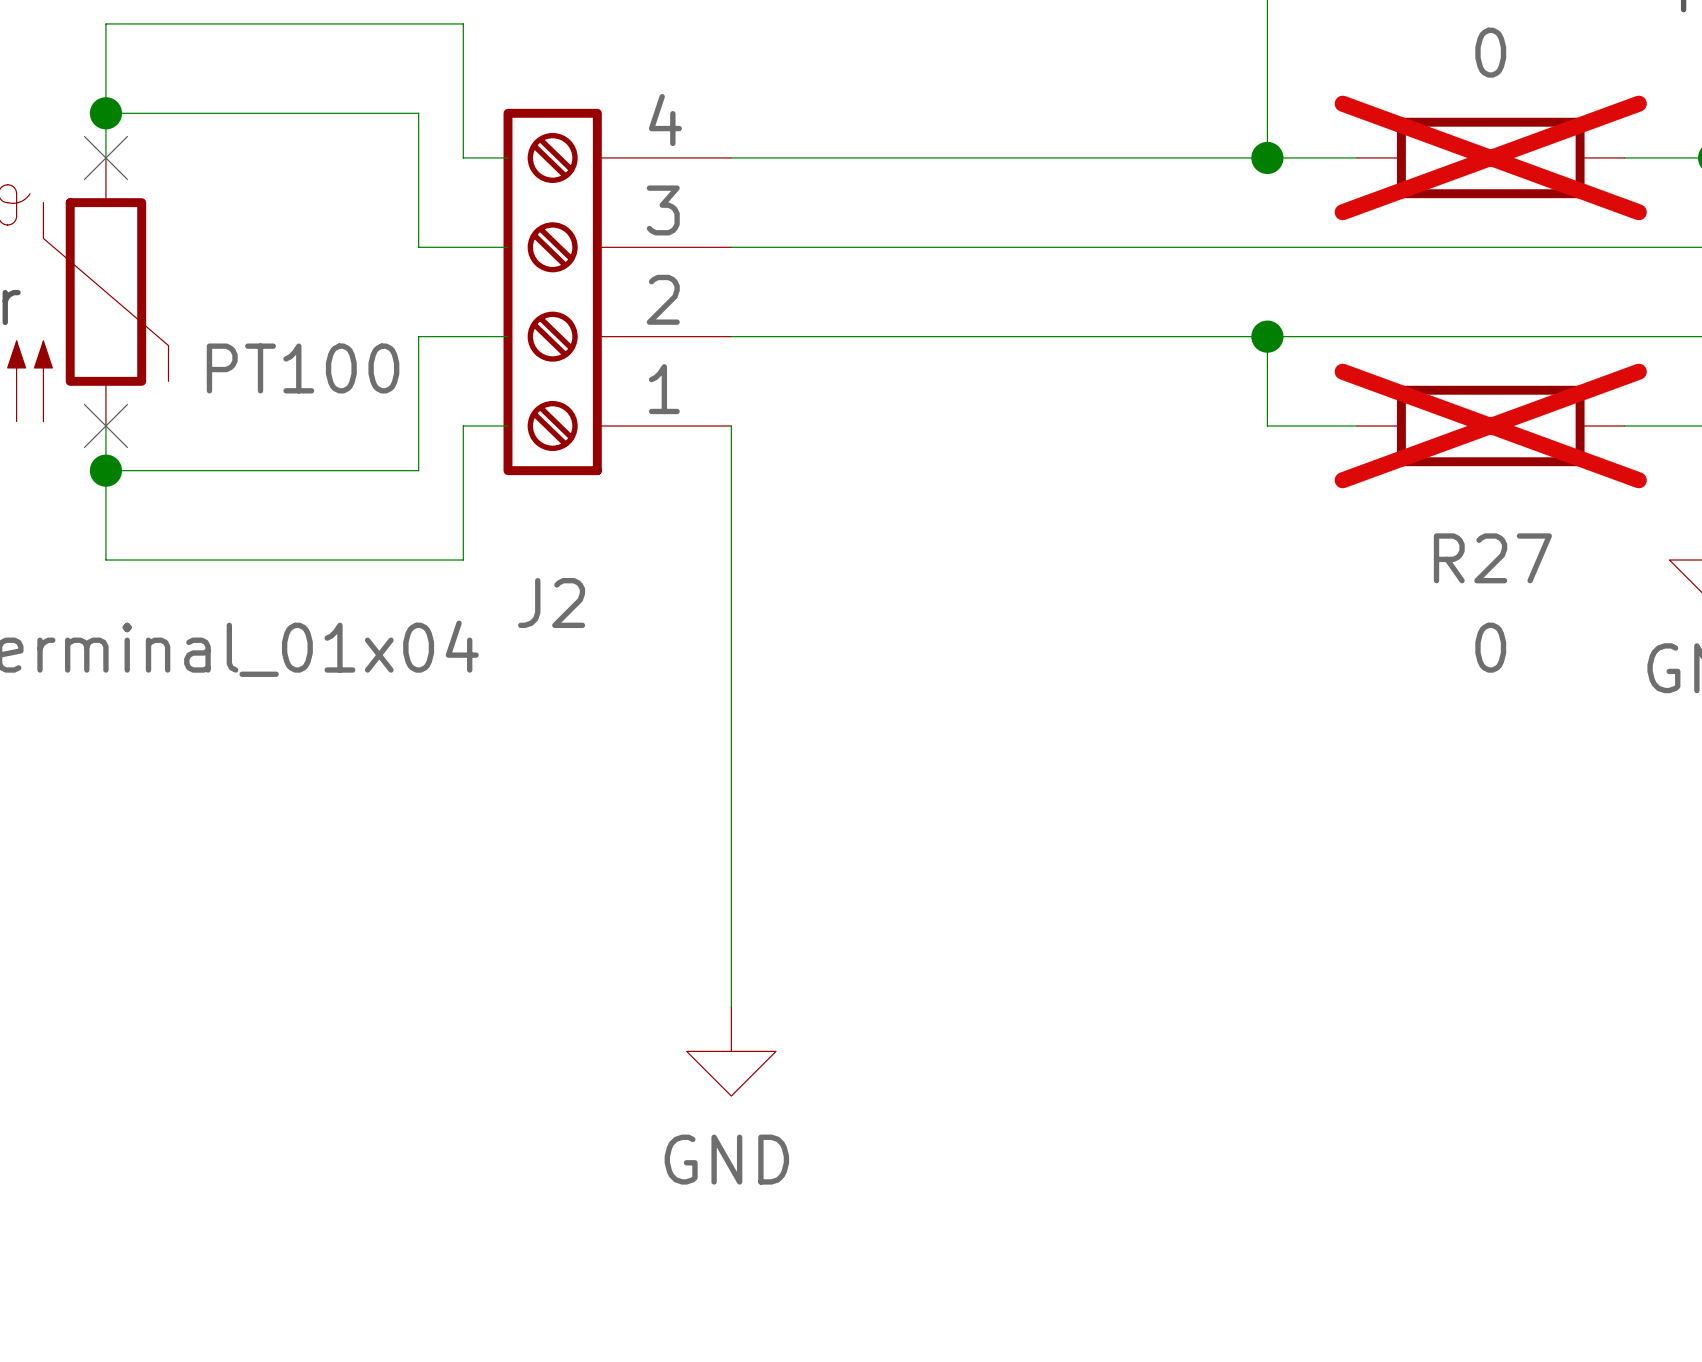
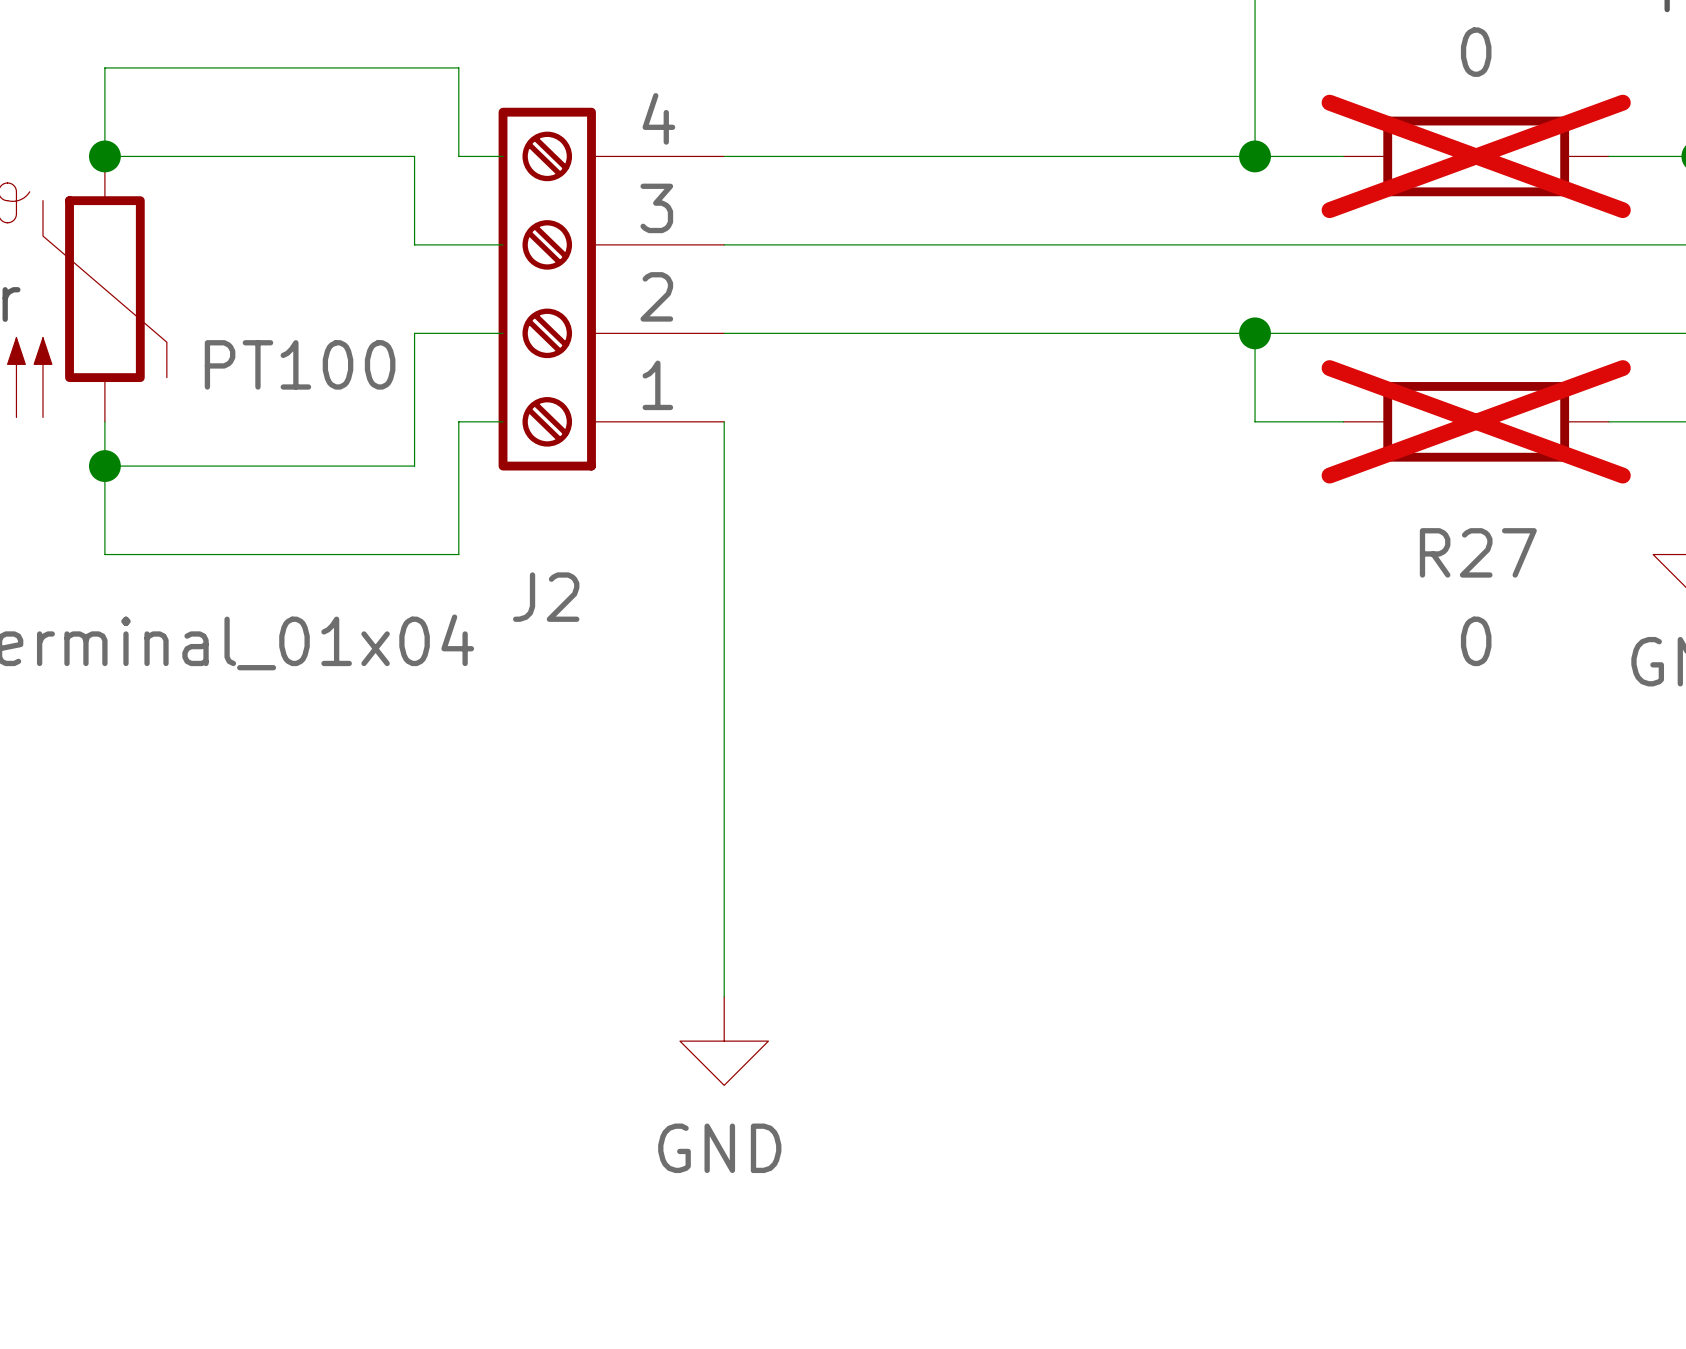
wire: (105, 68) (105, 23) (463, 23) (463, 68) -> (104, 67) (458, 67)
wire: (105, 113) (418, 113) (418, 157) -> (104, 156) (414, 156)
junction position: (105, 113) -> (104, 156)
no-connect mark: (105, 157) -> none
no-connect mark: (105, 425) -> none

